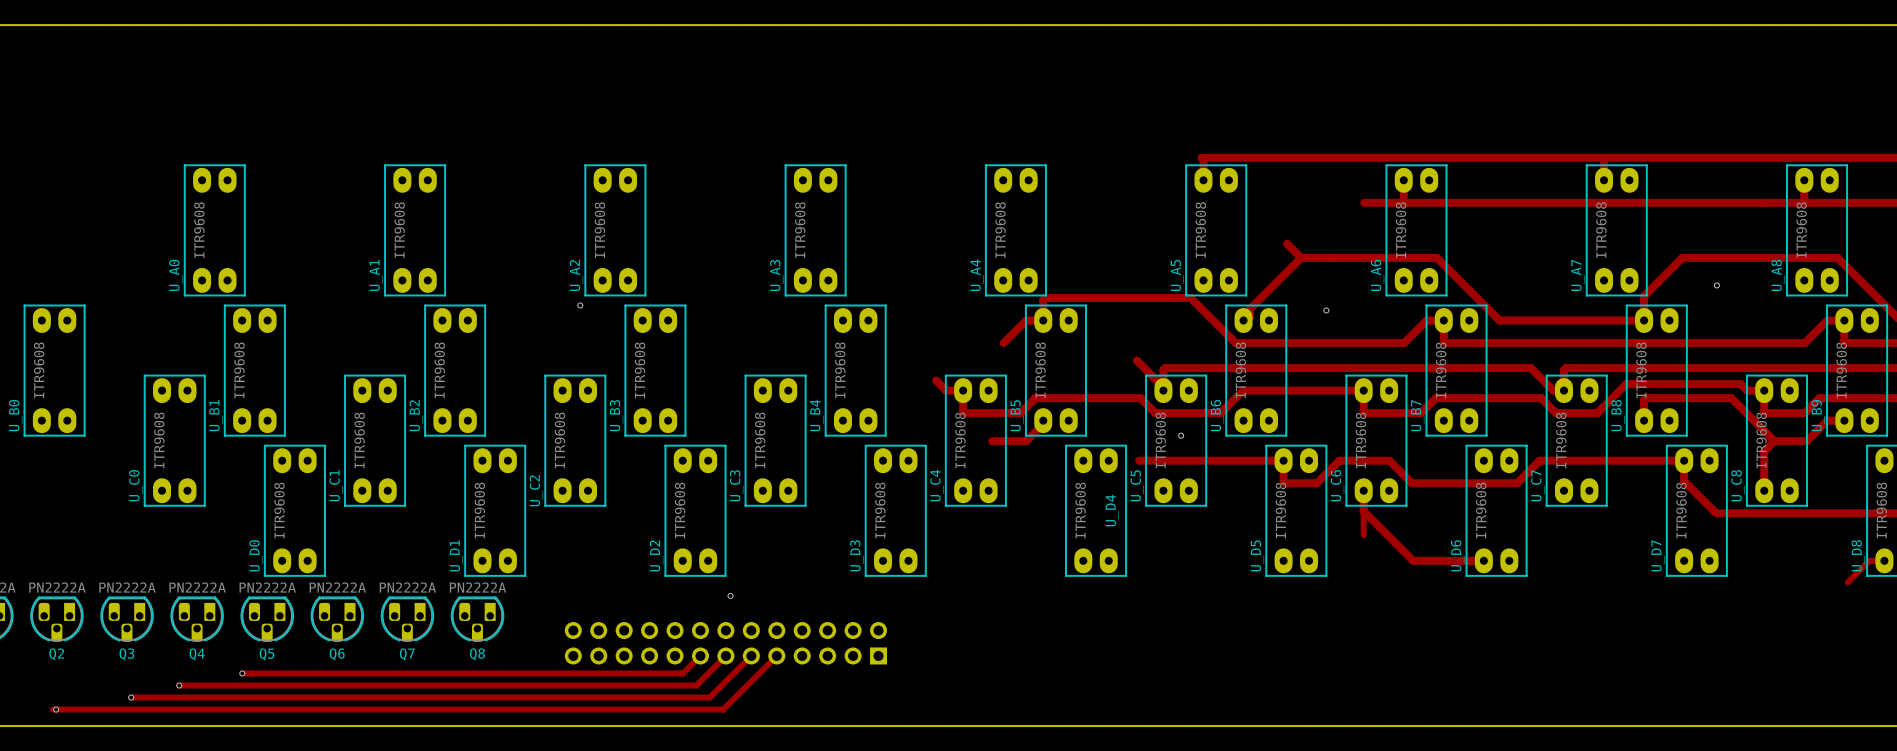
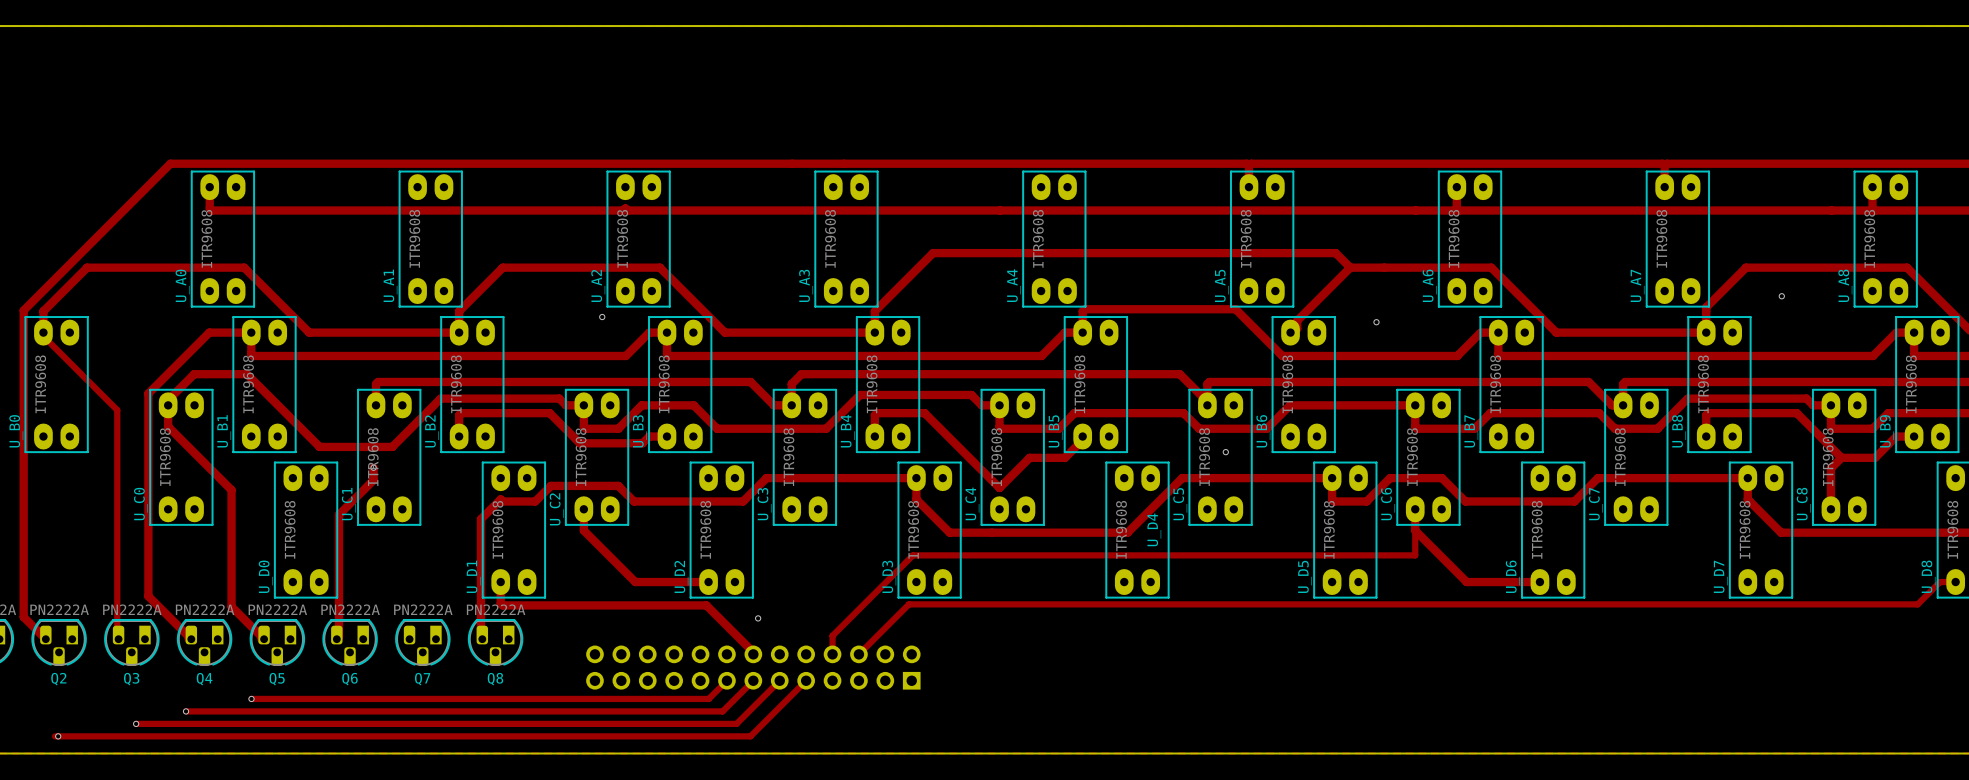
track: none -> (1246, 163) (170, 163) (23, 310) (23, 617) (45, 639)
track: none -> (209, 187) (209, 208) (211, 210) (623, 210) (625, 208) (627, 210) (1415, 210)
track: none -> (1335, 253) (933, 253) (874, 311) (874, 332) (724, 332) (660, 267) (502, 267) (459, 311) (459, 332) (309, 332) (244, 267) (87, 267) (43, 311) (43, 328)
track: none -> (43, 336) (117, 410) (117, 638)
track: none -> (1041, 356) (669, 356) (666, 353) (666, 332) (649, 332) (625, 356) (253, 356) (251, 353) (251, 332) (209, 332) (148, 393) (148, 596) (188, 636) (188, 639)
track: none -> (1179, 374) (801, 374) (791, 384) (791, 405) (774, 405) (750, 381) (378, 381) (376, 384) (376, 405)
track: none -> (971, 394) (860, 394) (826, 428) (717, 428) (693, 405) (641, 405) (618, 428) (585, 428) (583, 426) (583, 405) (566, 405) (559, 398) (440, 398) (392, 446) (319, 446) (246, 374) (194, 374) (168, 400)
track: none -> (168, 405) (168, 426) (231, 490) (231, 606) (261, 636) (261, 639)
track: none -> (459, 436) (459, 415) (461, 413) (549, 413) (579, 443) (642, 443) (649, 436) (666, 436)
track: none -> (874, 436) (874, 415) (876, 413) (924, 413) (999, 487) (1029, 457)
track: none -> (373, 467) (373, 480) (339, 514) (339, 637) (336, 639)
via: none -> (373, 467)
track: none -> (1182, 478) (1127, 532) (949, 532) (916, 499) (916, 478) (766, 478) (743, 501) (634, 501) (618, 485) (550, 485) (535, 501) (502, 501) (500, 499) (480, 519) (480, 637)
track: none -> (583, 509) (583, 530) (635, 582) (708, 582)
track: none -> (1415, 555) (912, 555) (832, 635) (832, 654)
track: none -> (500, 582) (500, 603) (502, 605) (706, 605) (753, 652)
track: none -> (1917, 604) (908, 604) (858, 654)

